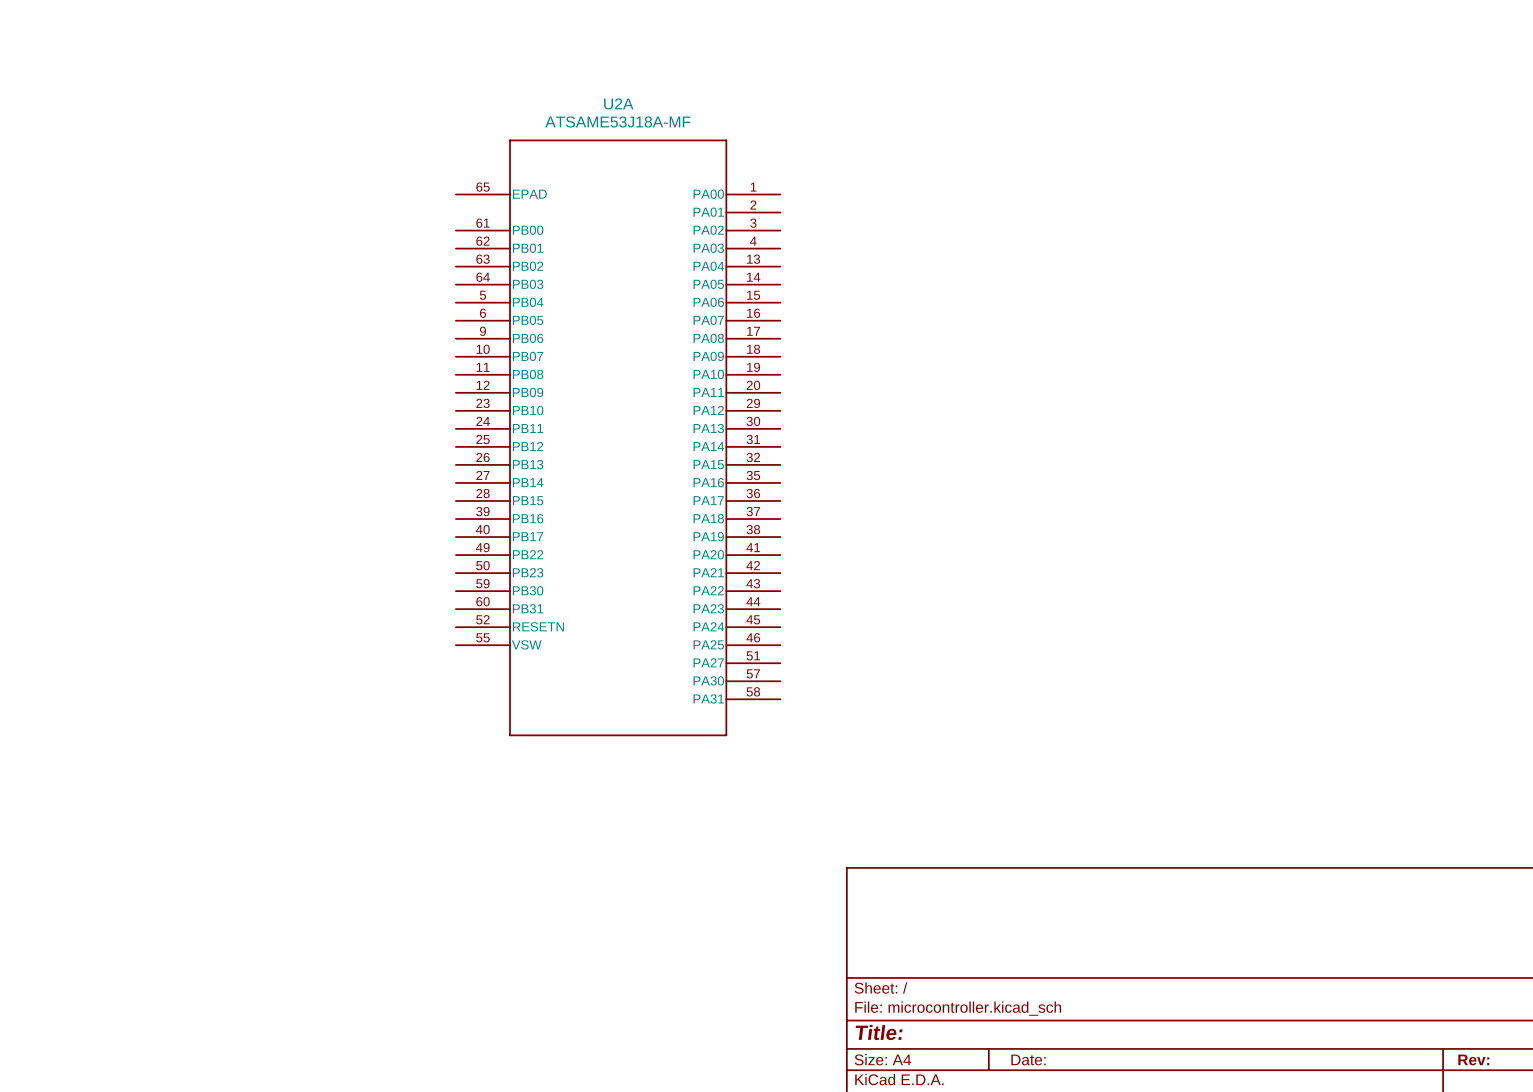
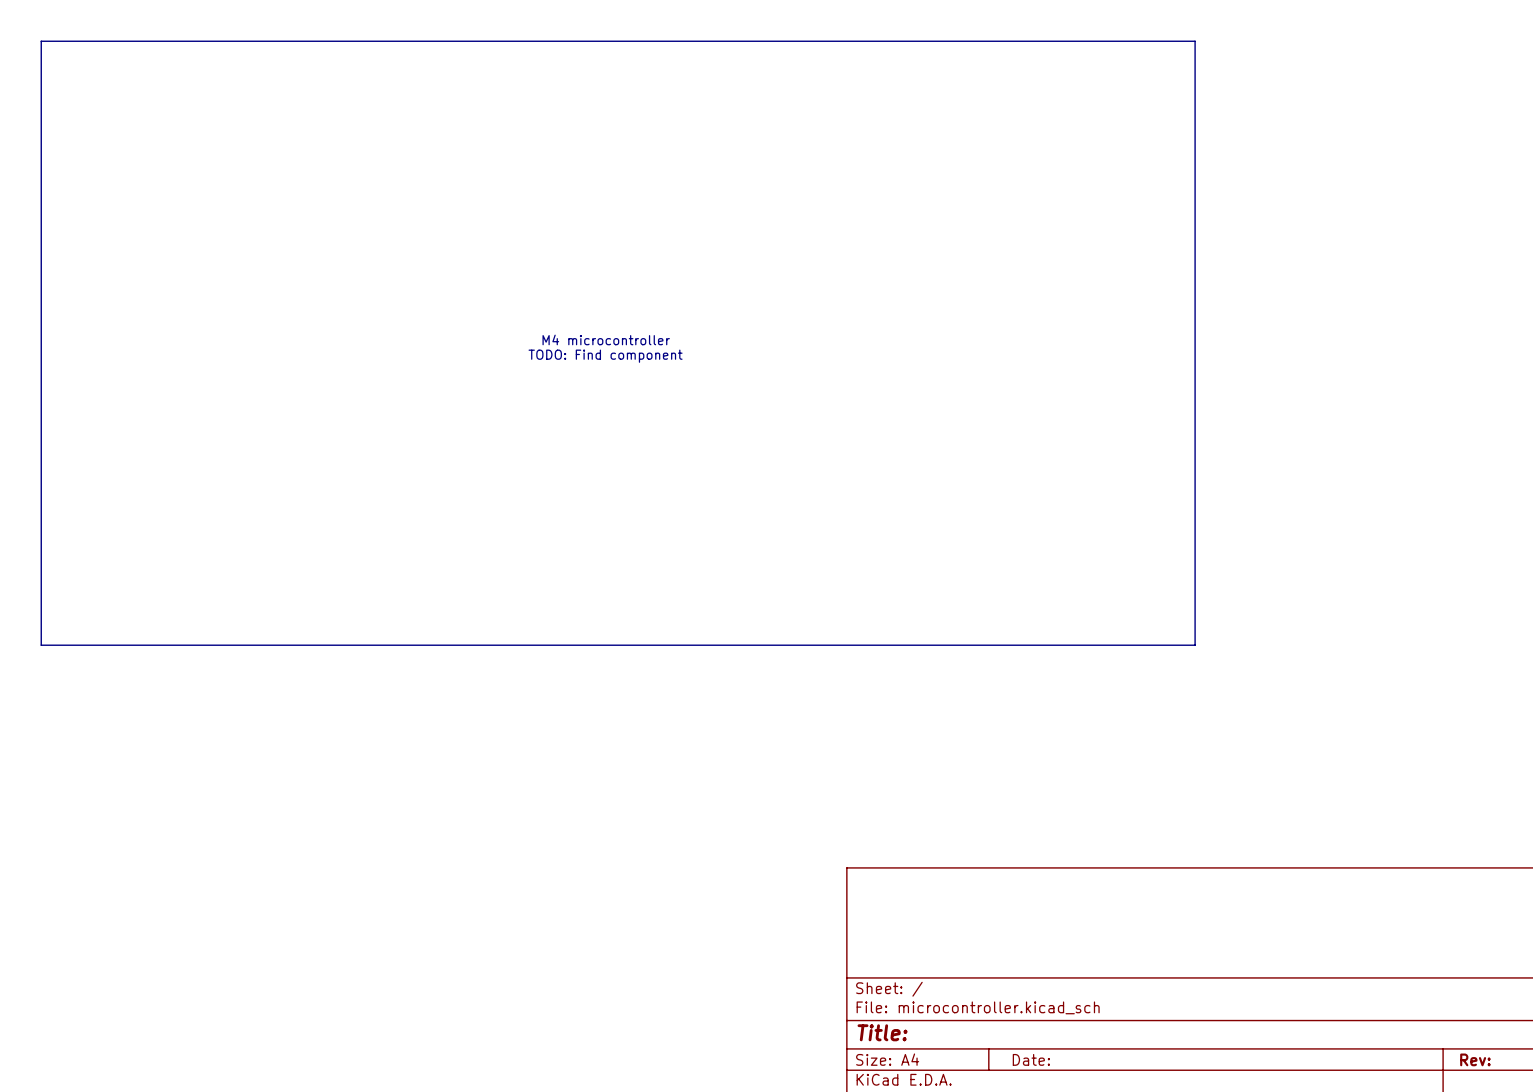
line: none -> (41, 41) (1195, 41) (1195, 645) (41, 645) (41, 41)
text: none -> M4 microcontroller (606, 339)
text: none -> TODO: Find component (605, 356)
U2A: ATSAME53J18A-MF (618, 437) -> none

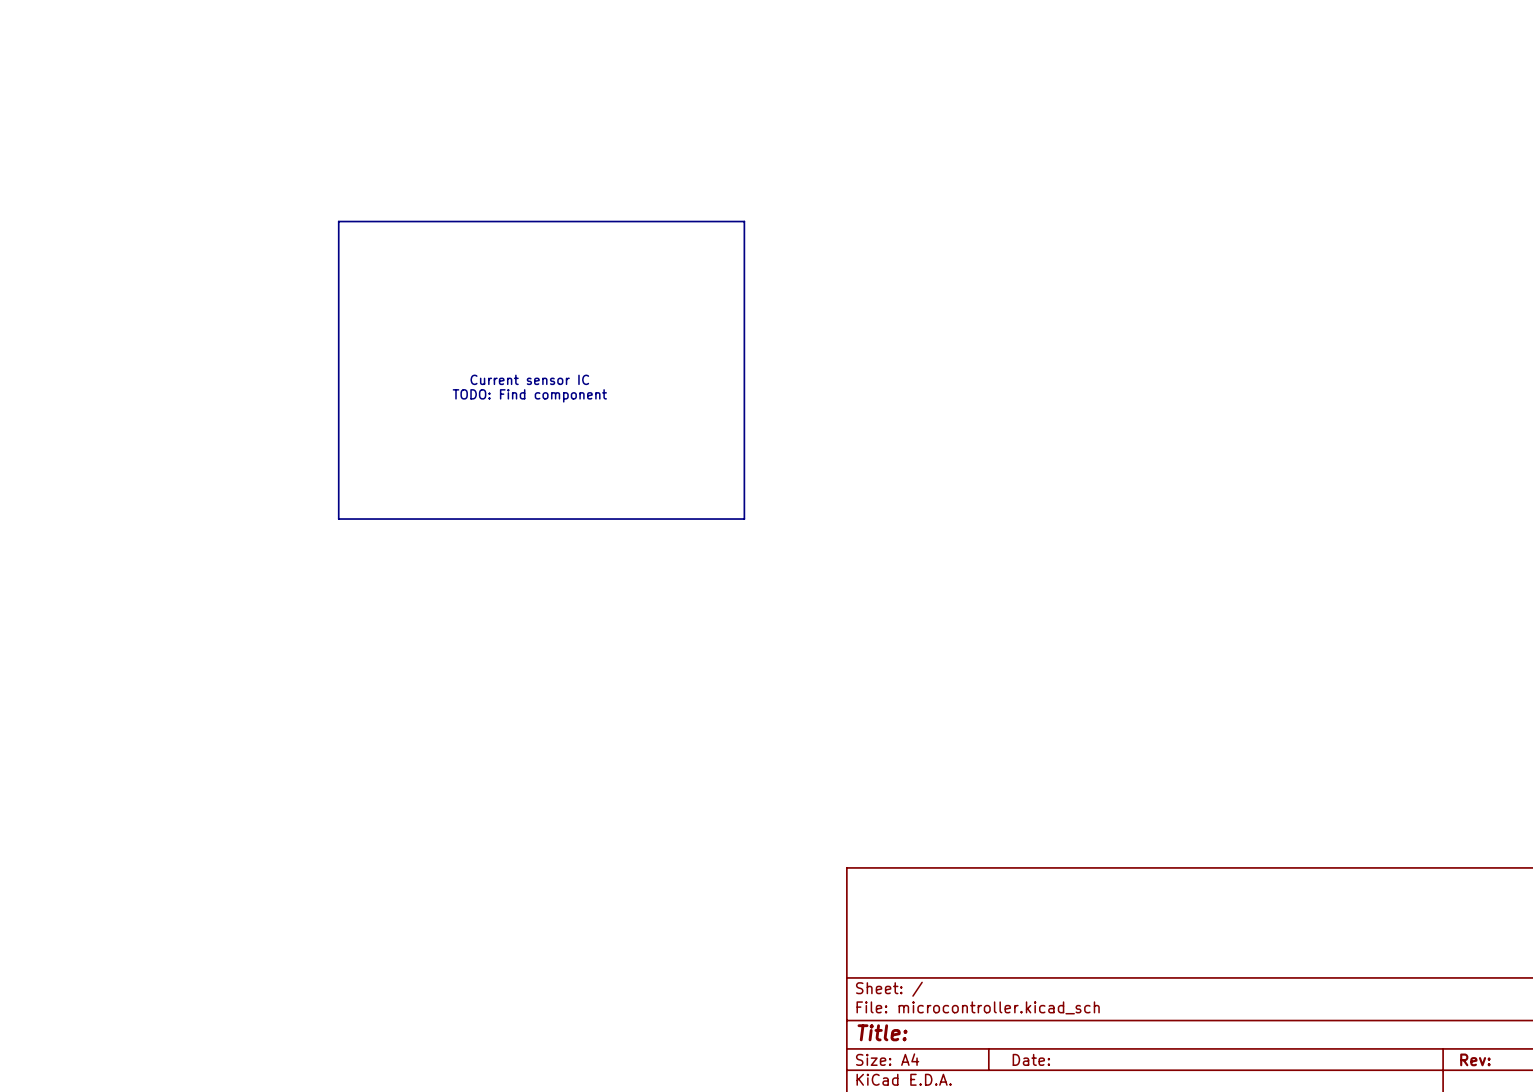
line: (41, 41) (1195, 41) (1195, 645) (41, 645) (41, 41) -> none
line: none -> (338, 221) (744, 221) (744, 519) (338, 519) (338, 221)
text: M4 microcontroller (606, 339) -> none
text position: TODO: Find component (605, 356) -> TODO: Find component (529, 395)
text: none -> Current sensor IC (529, 379)

